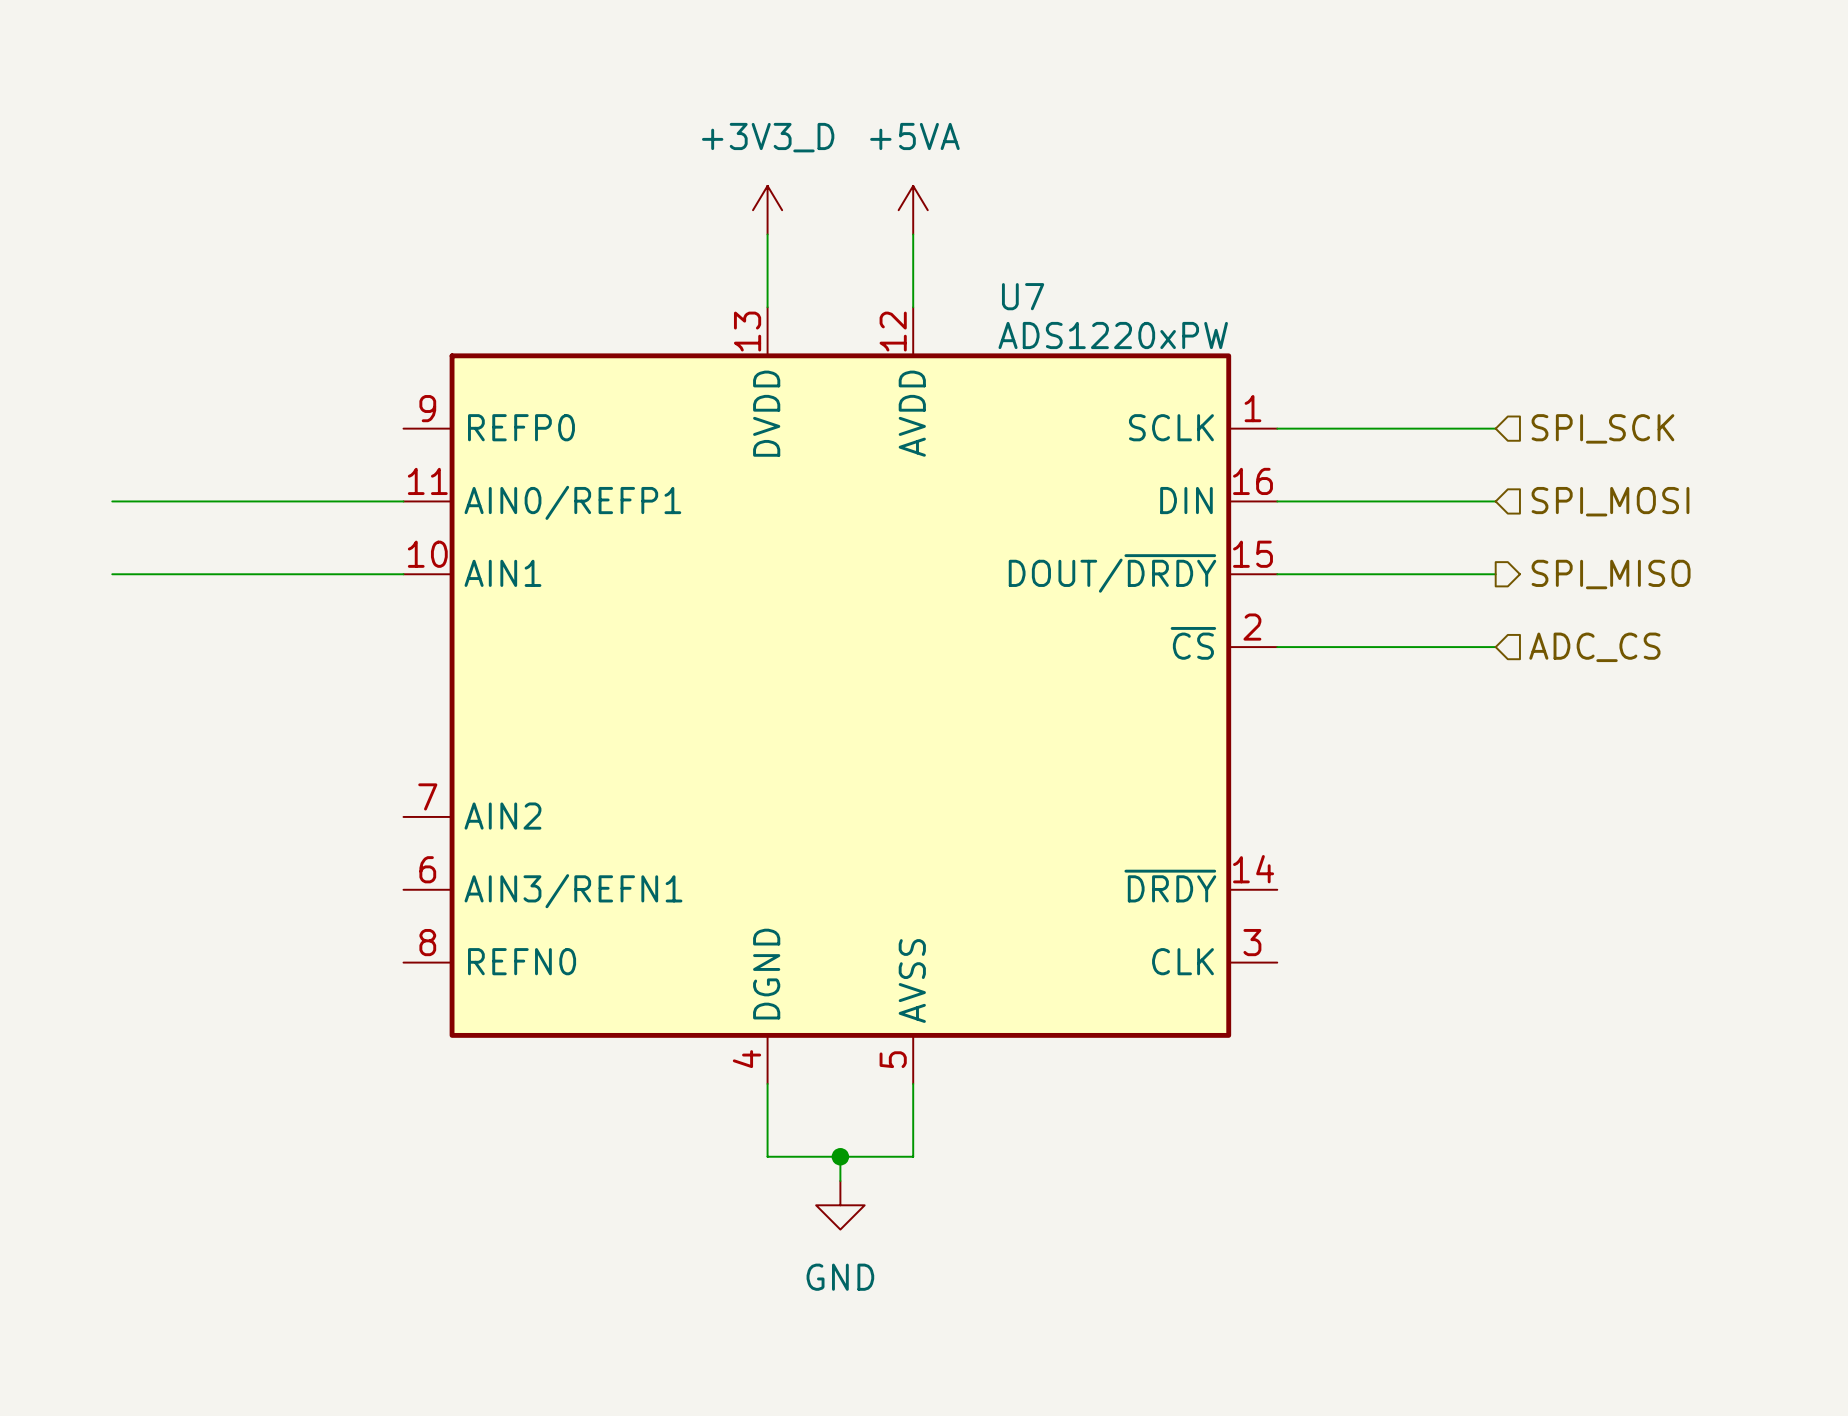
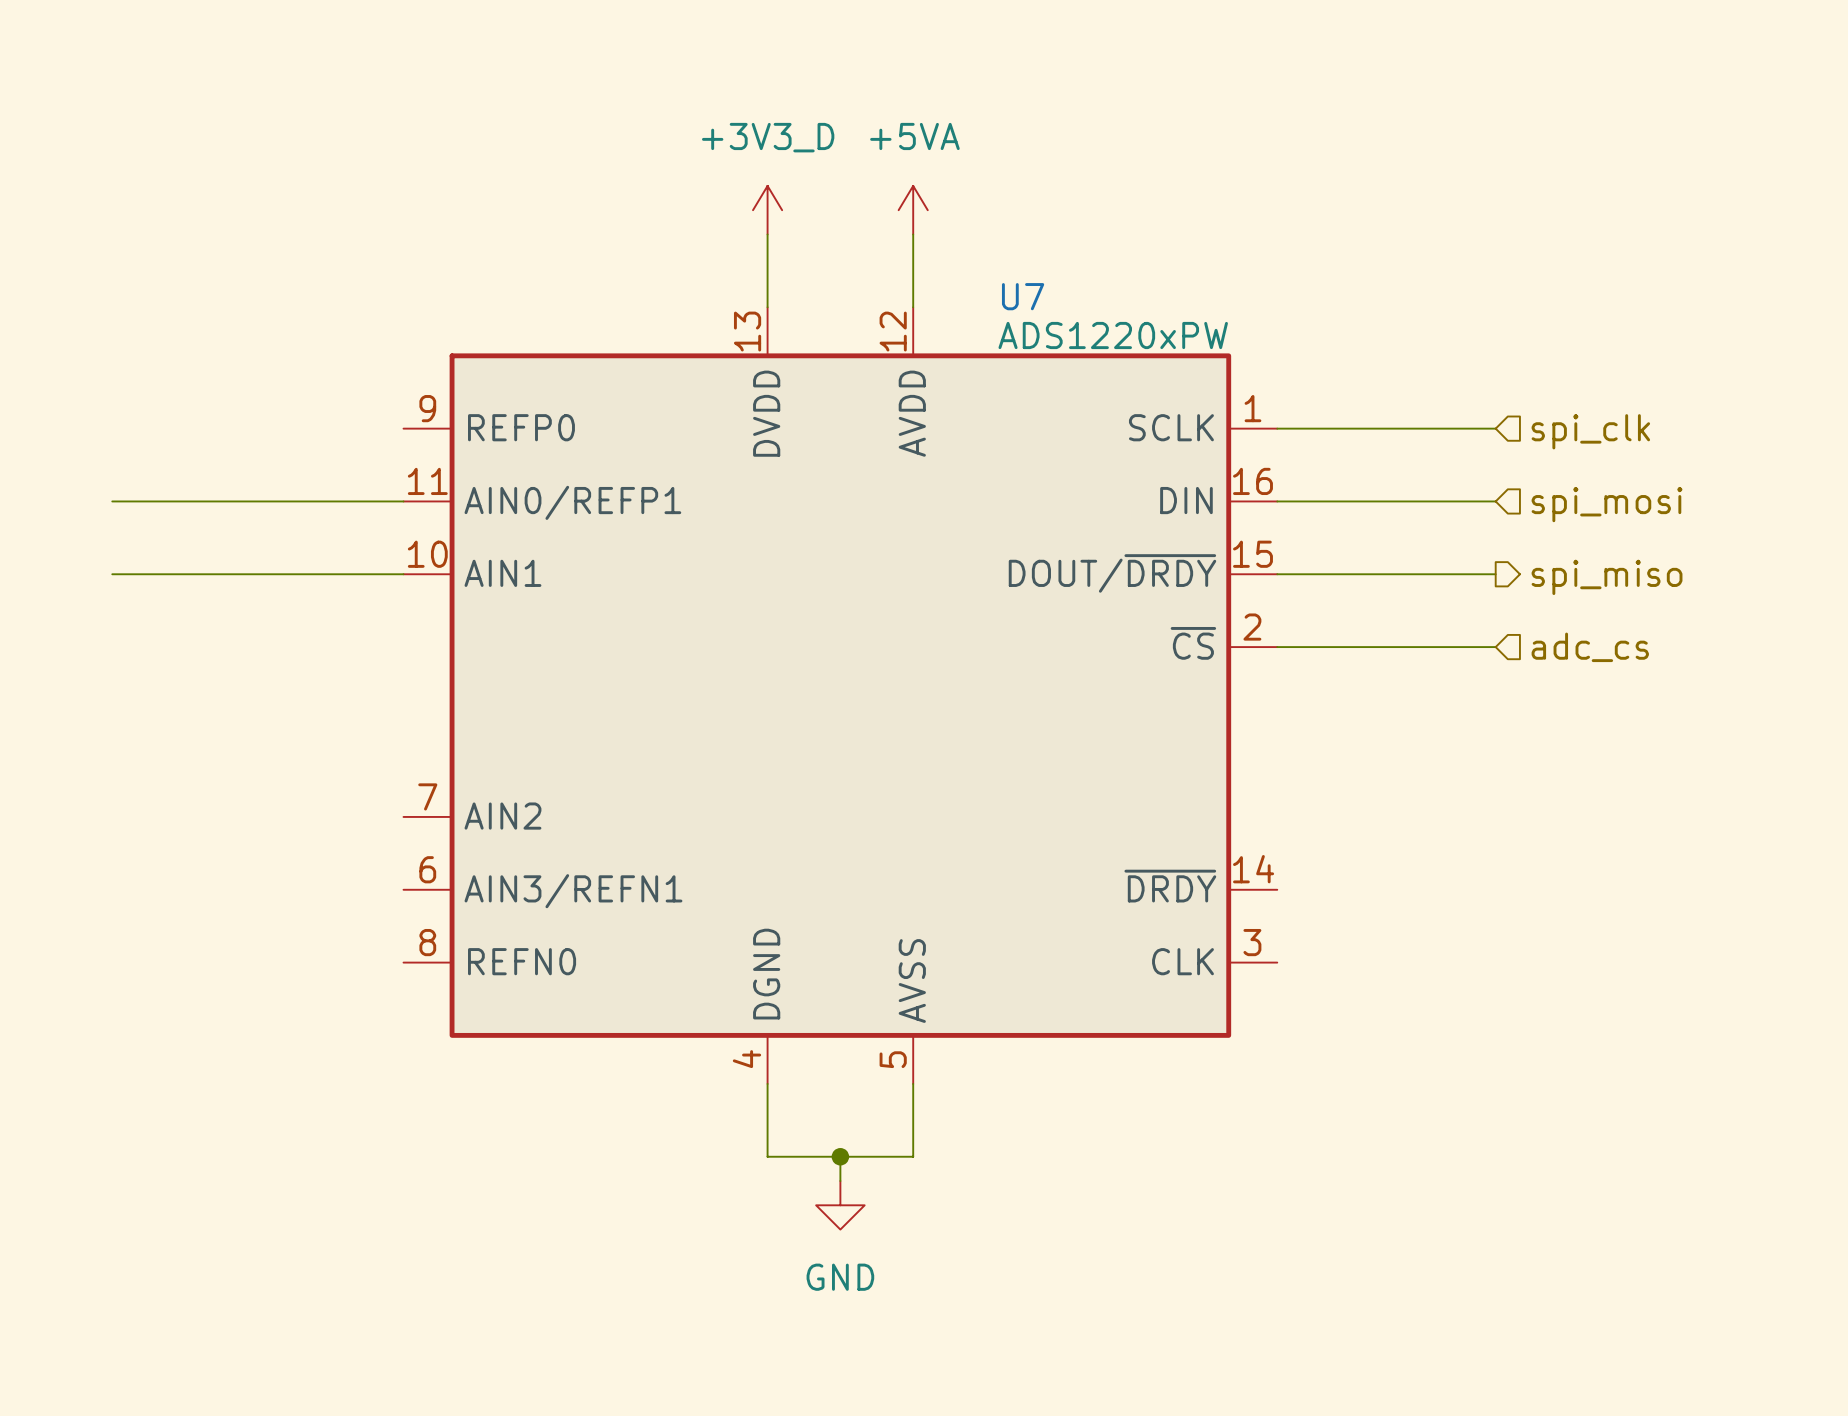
hierarchical label: SPI_SCK (1602, 428) -> spi_clk (1590, 431)
hierarchical label: SPI_MOSI (1610, 501) -> spi_mosi (1607, 504)
hierarchical label: SPI_MISO (1611, 574) -> spi_miso (1607, 577)
hierarchical label: ADC_CS (1594, 647) -> adc_cs (1590, 647)

